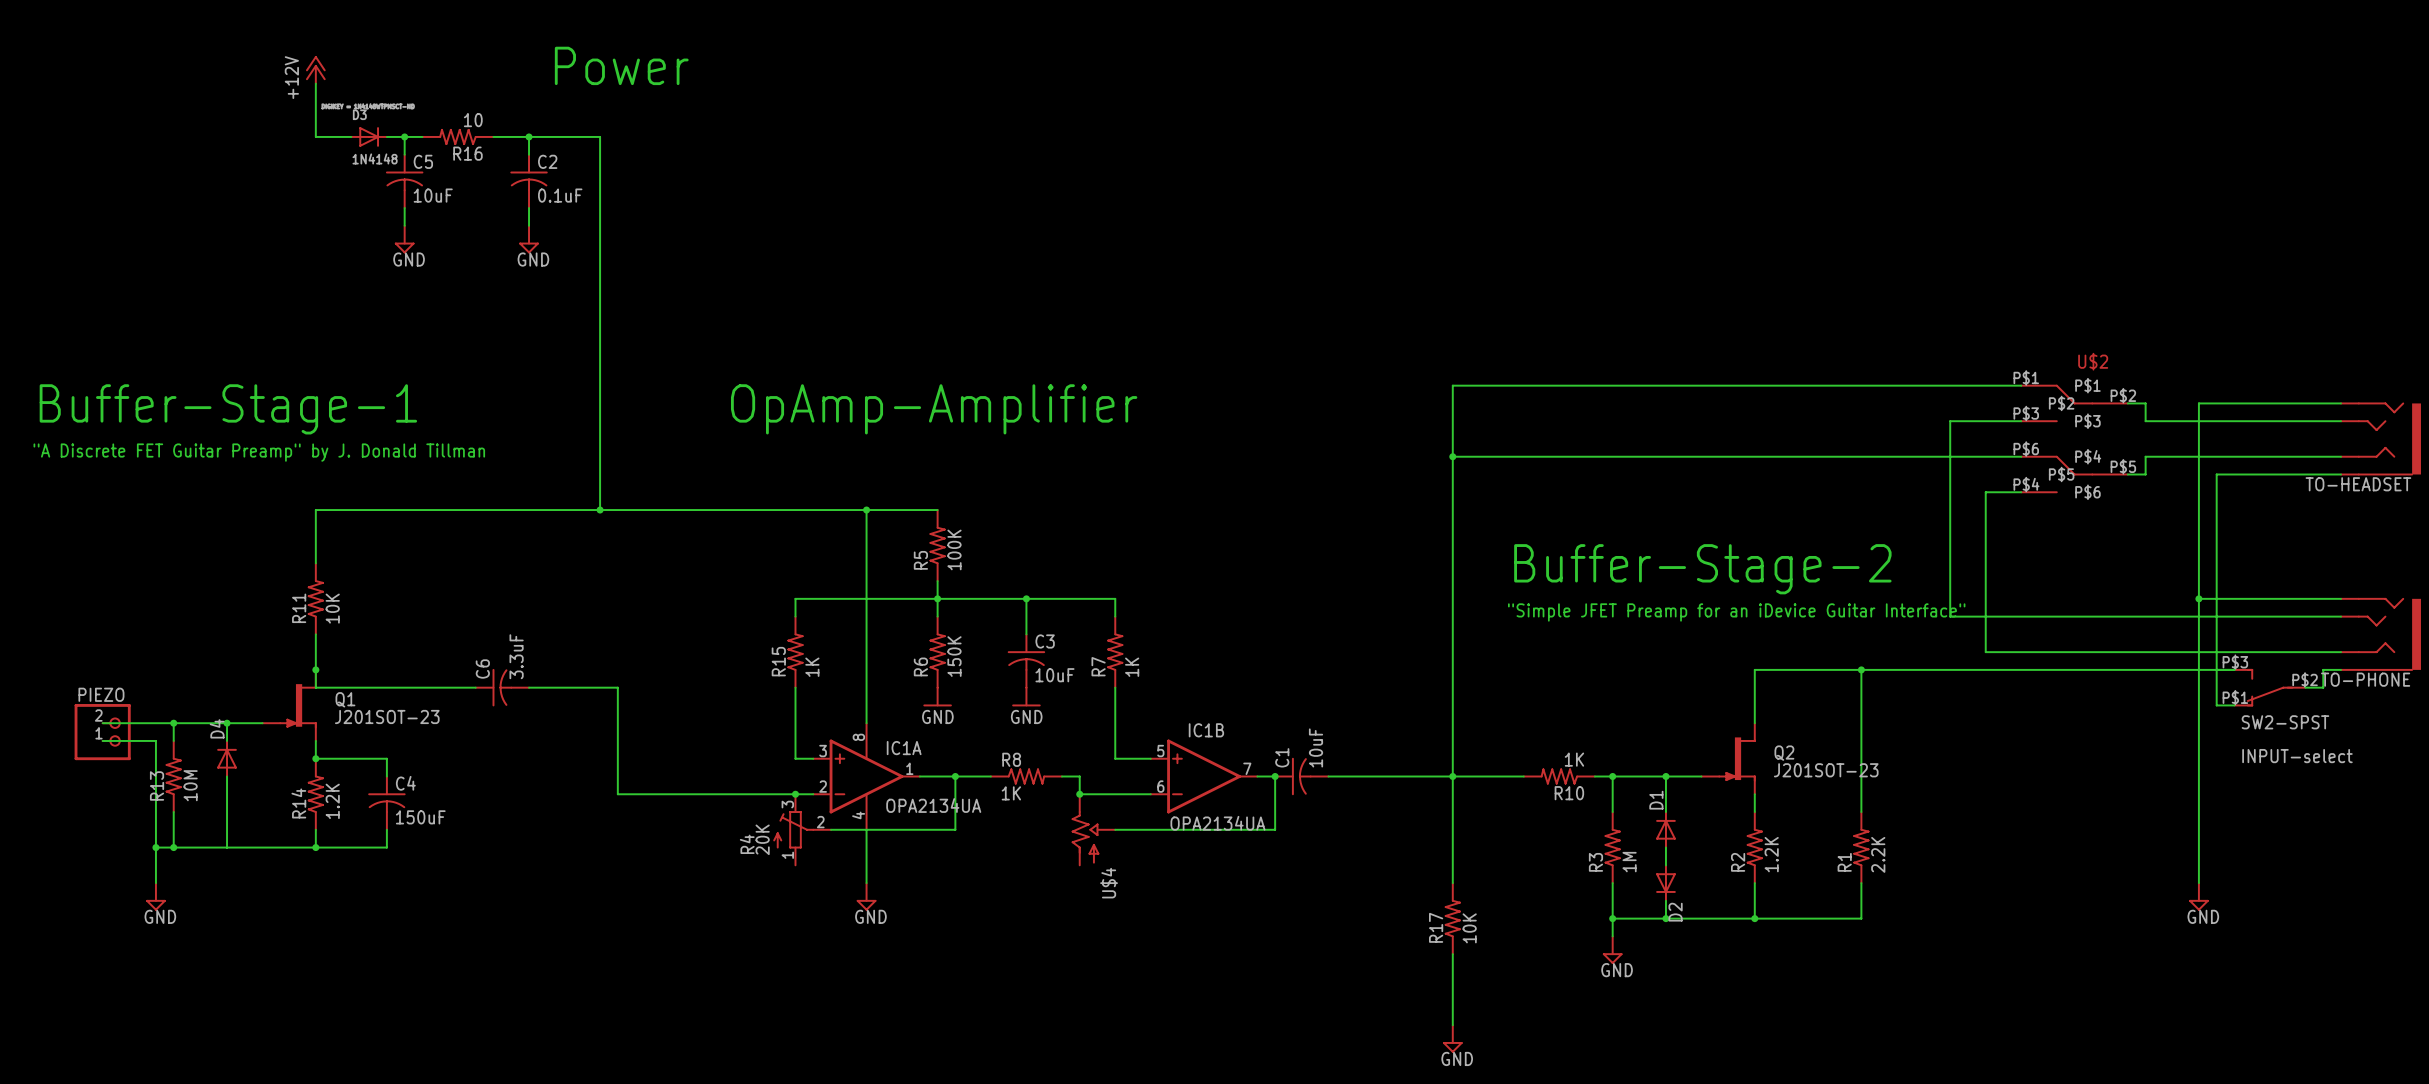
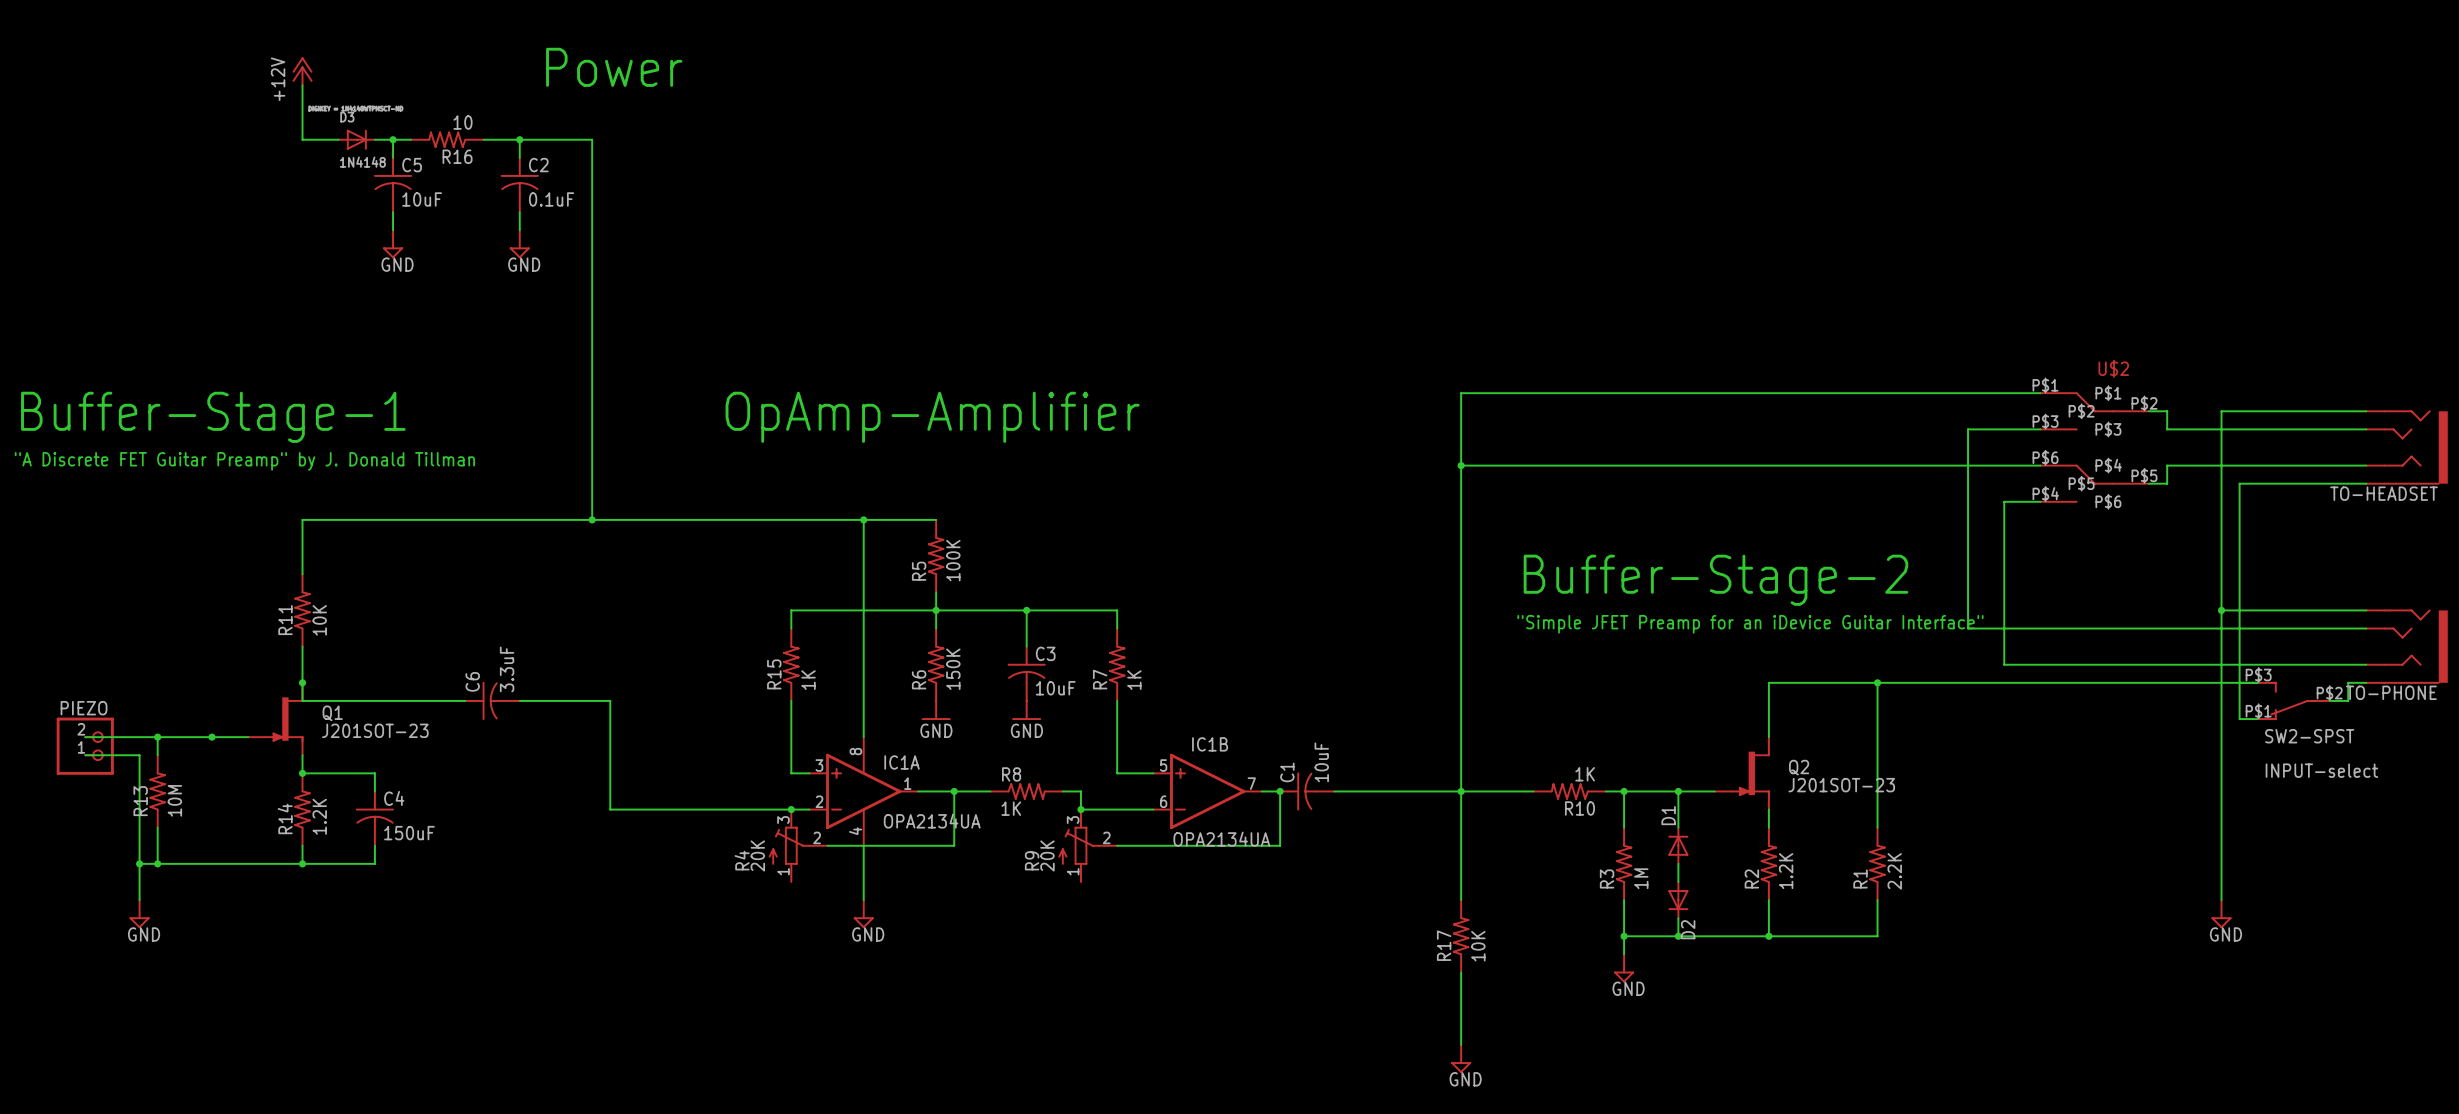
wire: (227, 723) (227, 740) -> none
D4: (227, 758) -> none
wire: (227, 776) (227, 847) -> none
R9: none -> 20K (1087, 845)
U$4: (1093, 829) -> none

